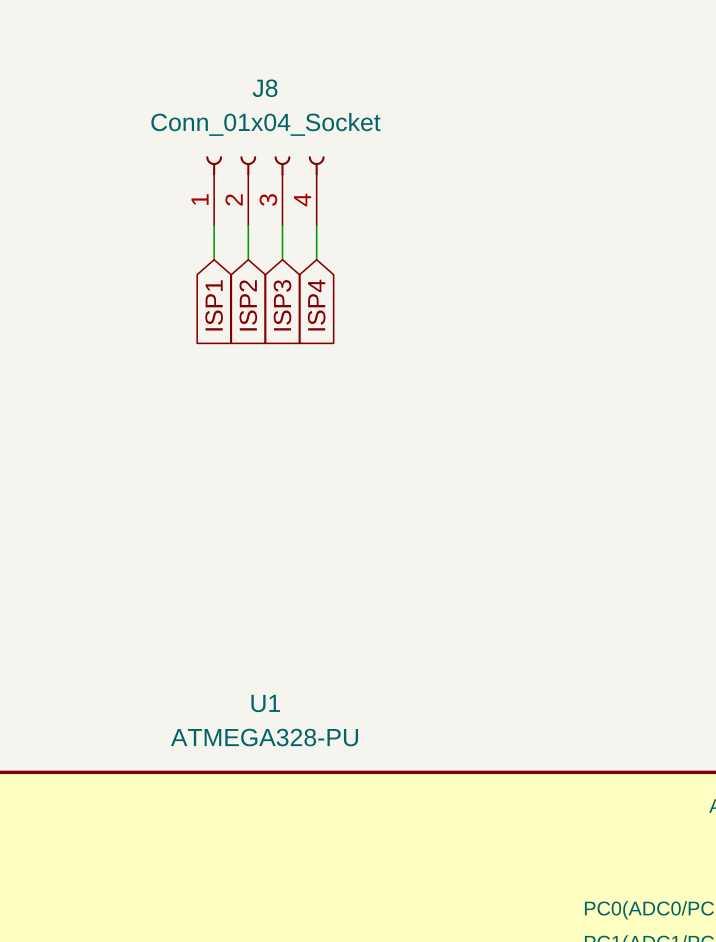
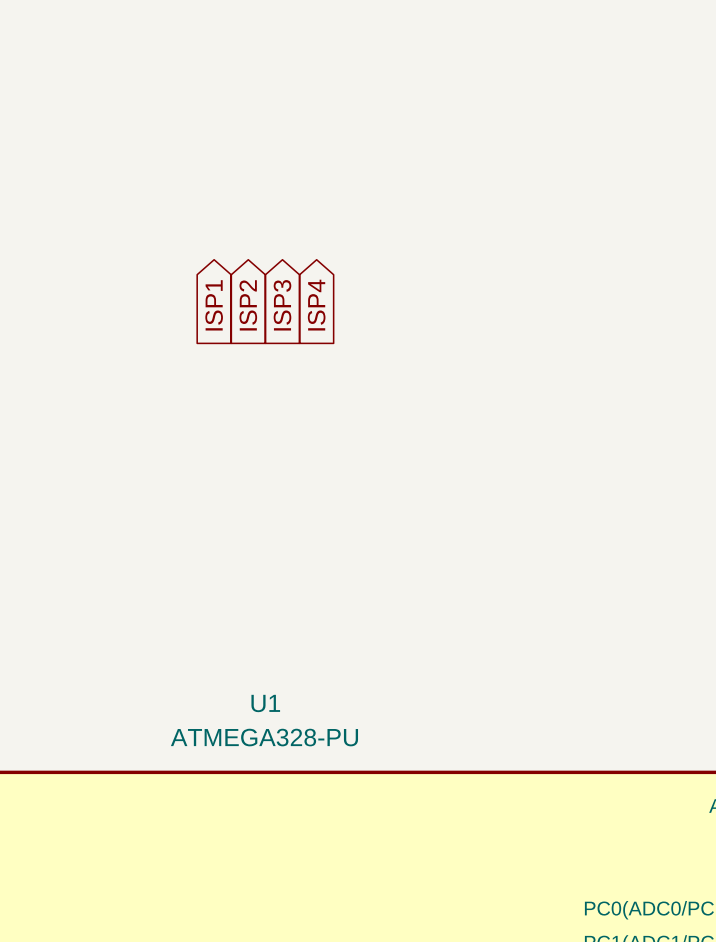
J8: Conn_01x04_Socket (265, 190) -> none
wire: (214, 225) (214, 259) -> none
wire: (248, 225) (248, 259) -> none
wire: (282, 225) (282, 259) -> none
wire: (316, 225) (316, 259) -> none

